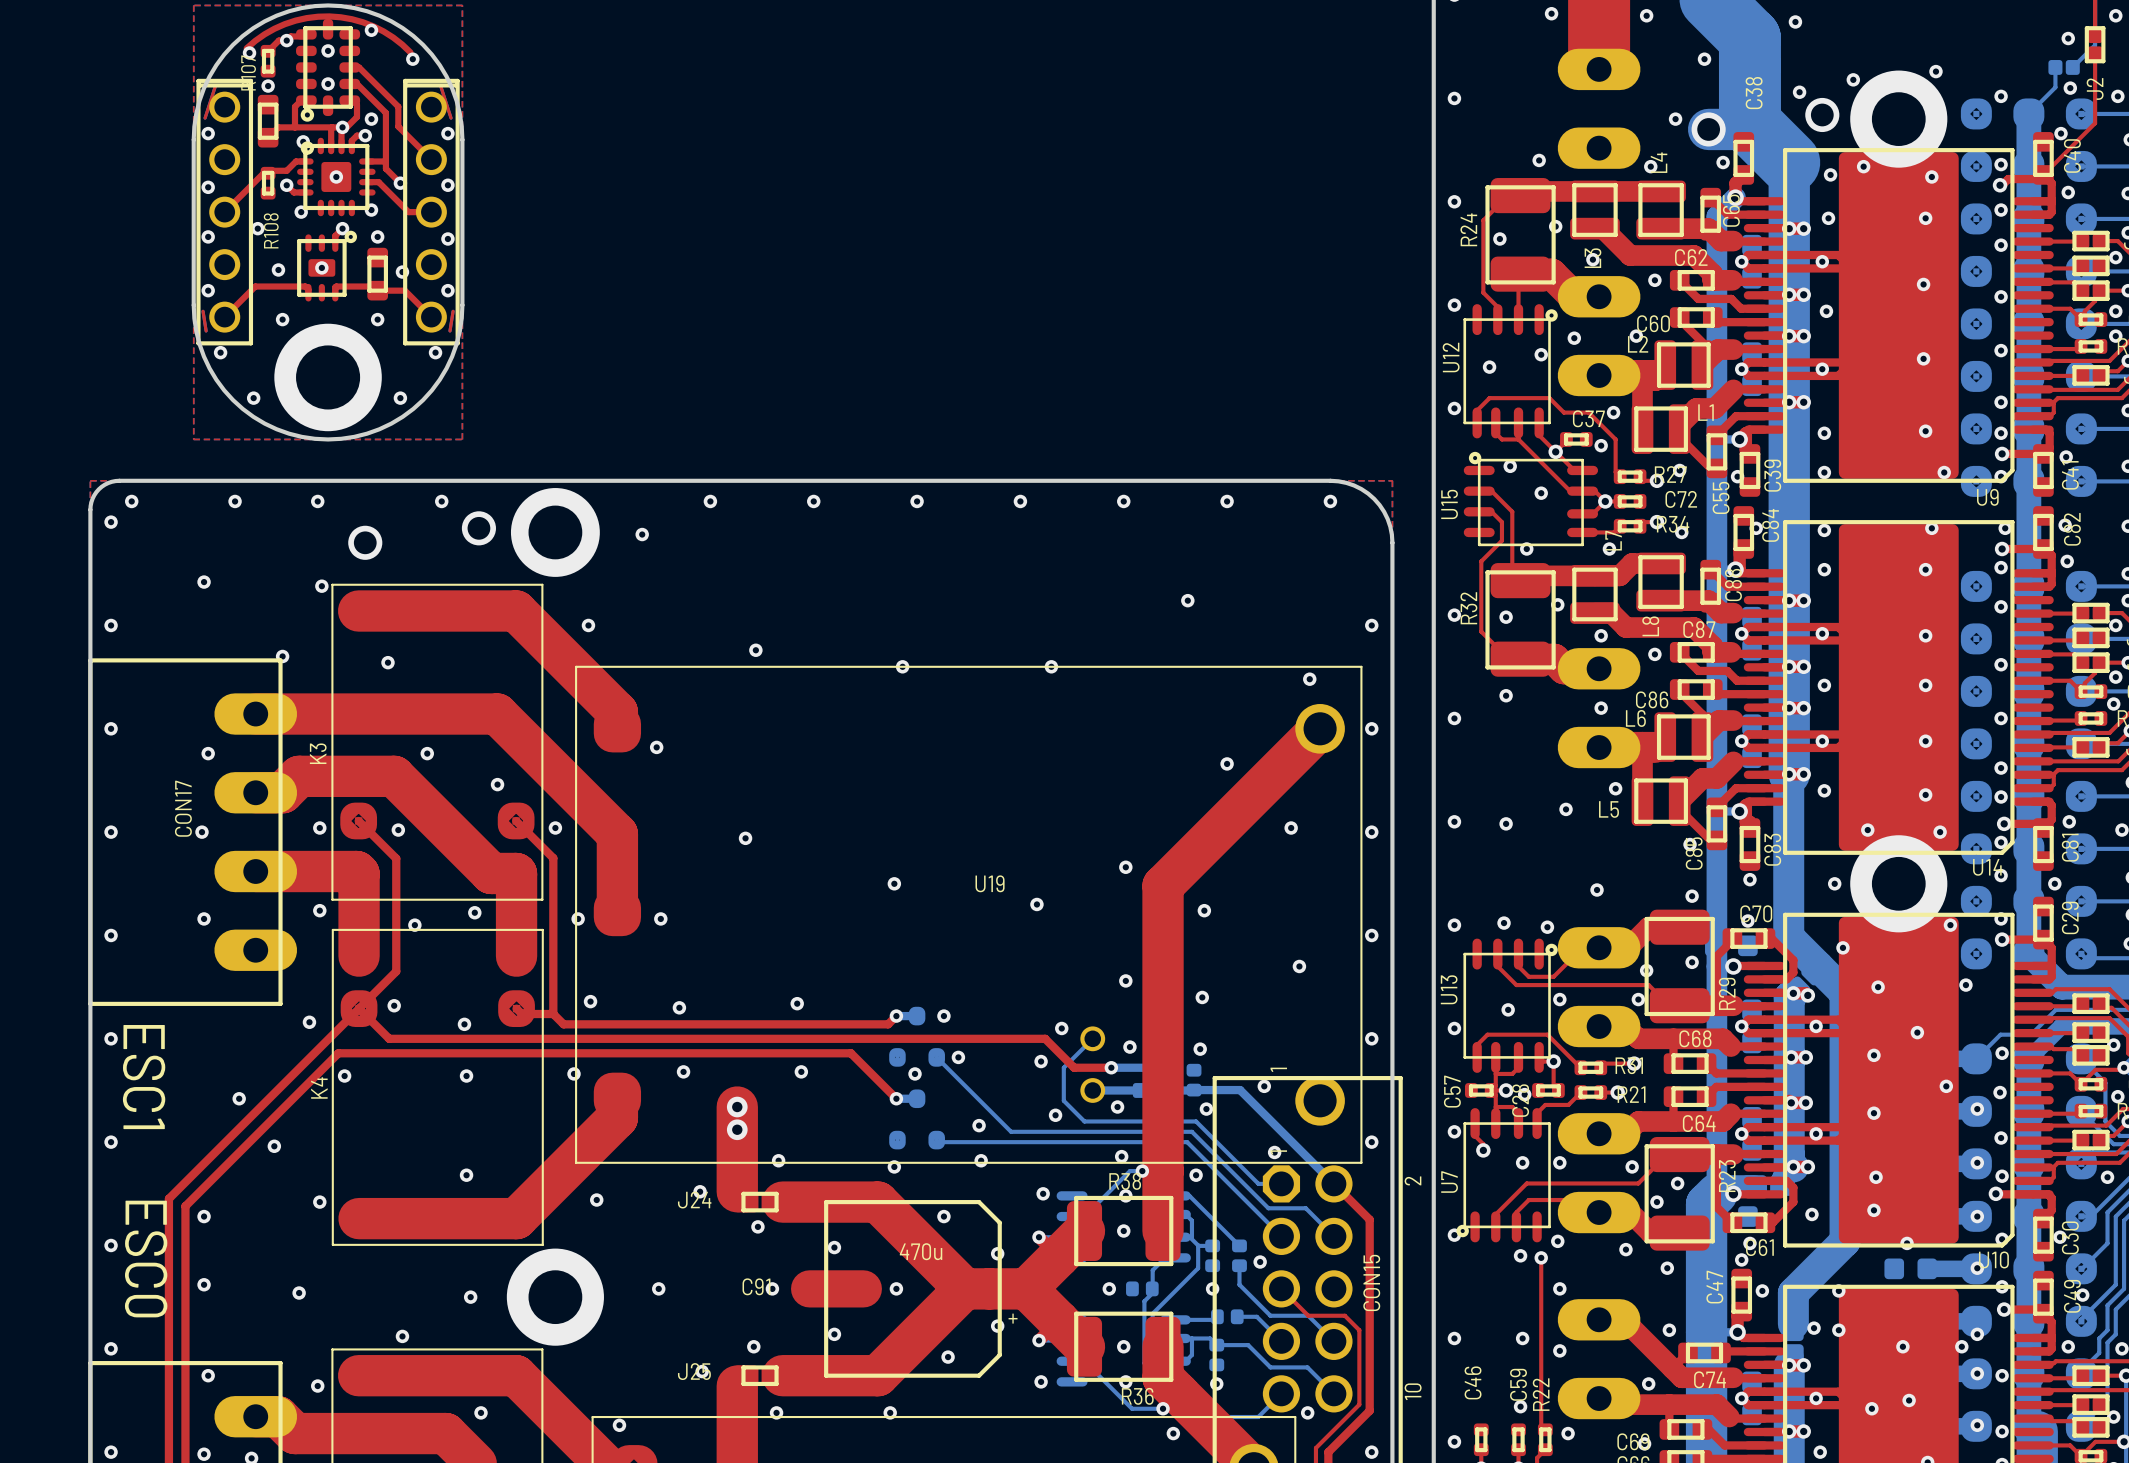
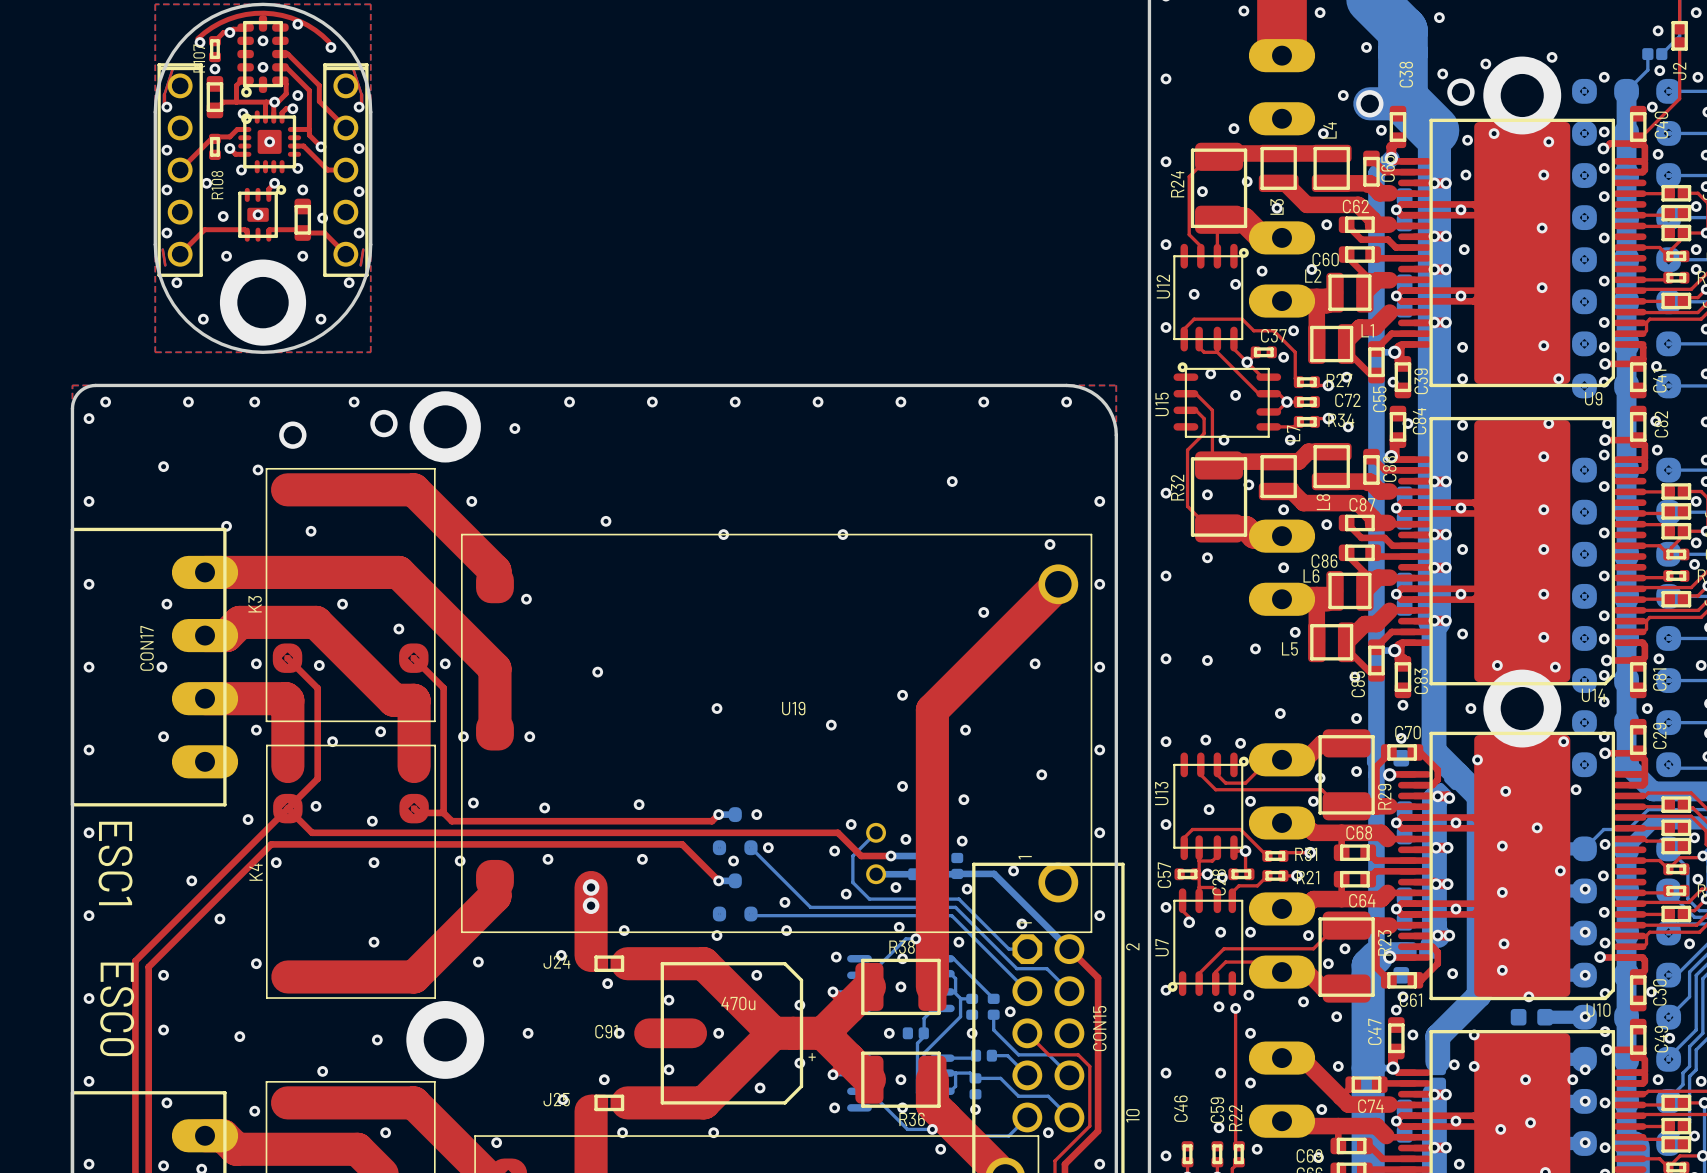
top track: none -> (164, 94) (164, 104) (166, 107)
top track: none -> (361, 94) (361, 104) (359, 107)

